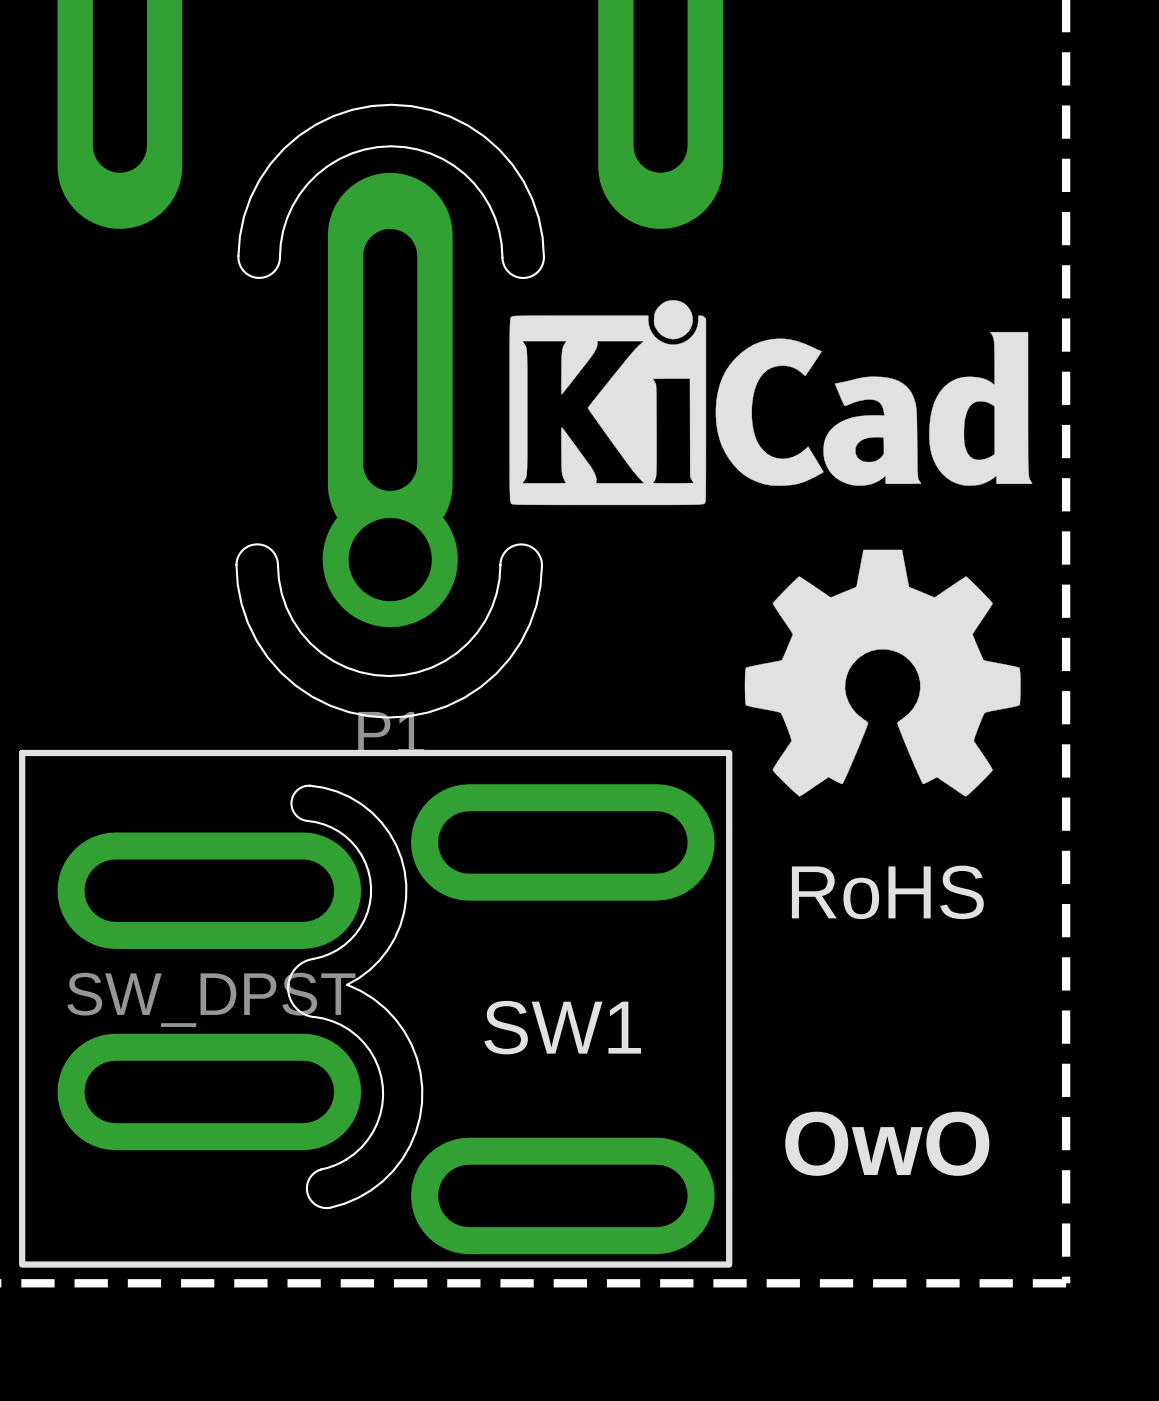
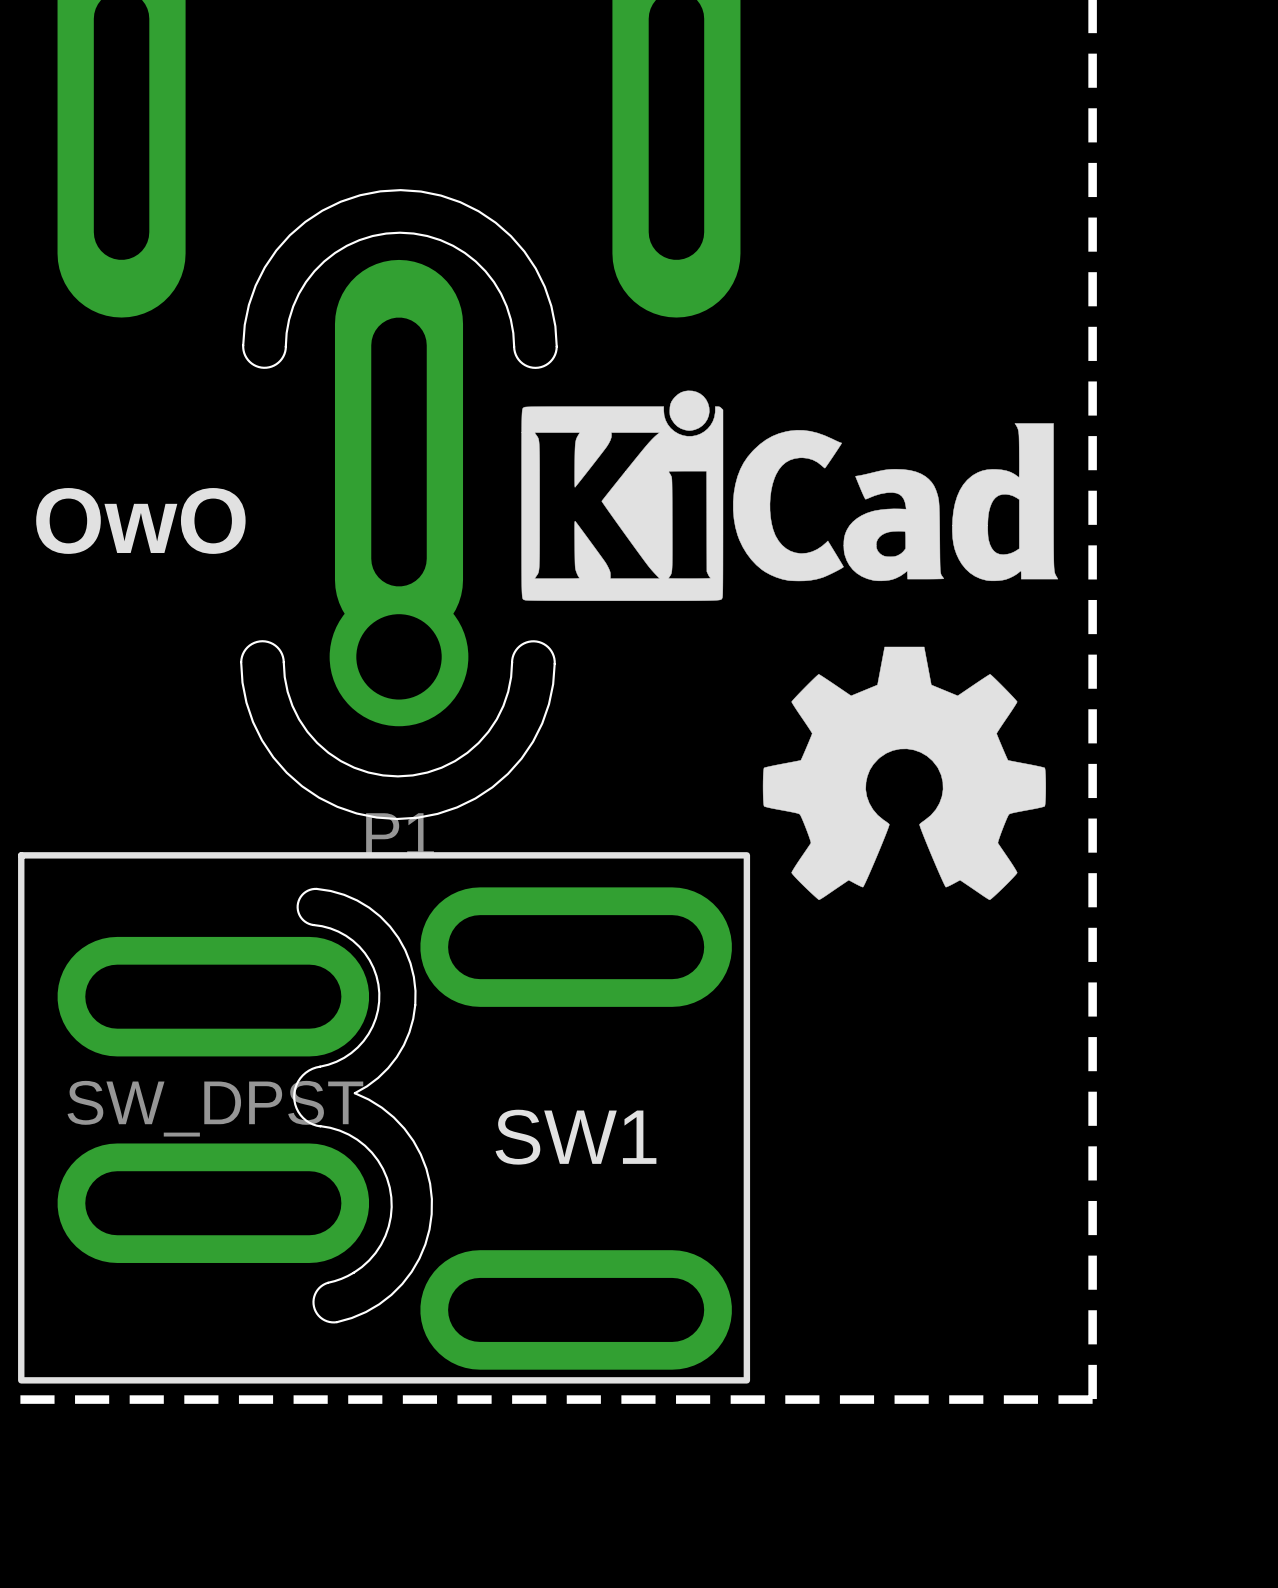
text: RoHS (887, 892) -> none
text position: OwO (887, 1143) -> OwO (140, 520)

